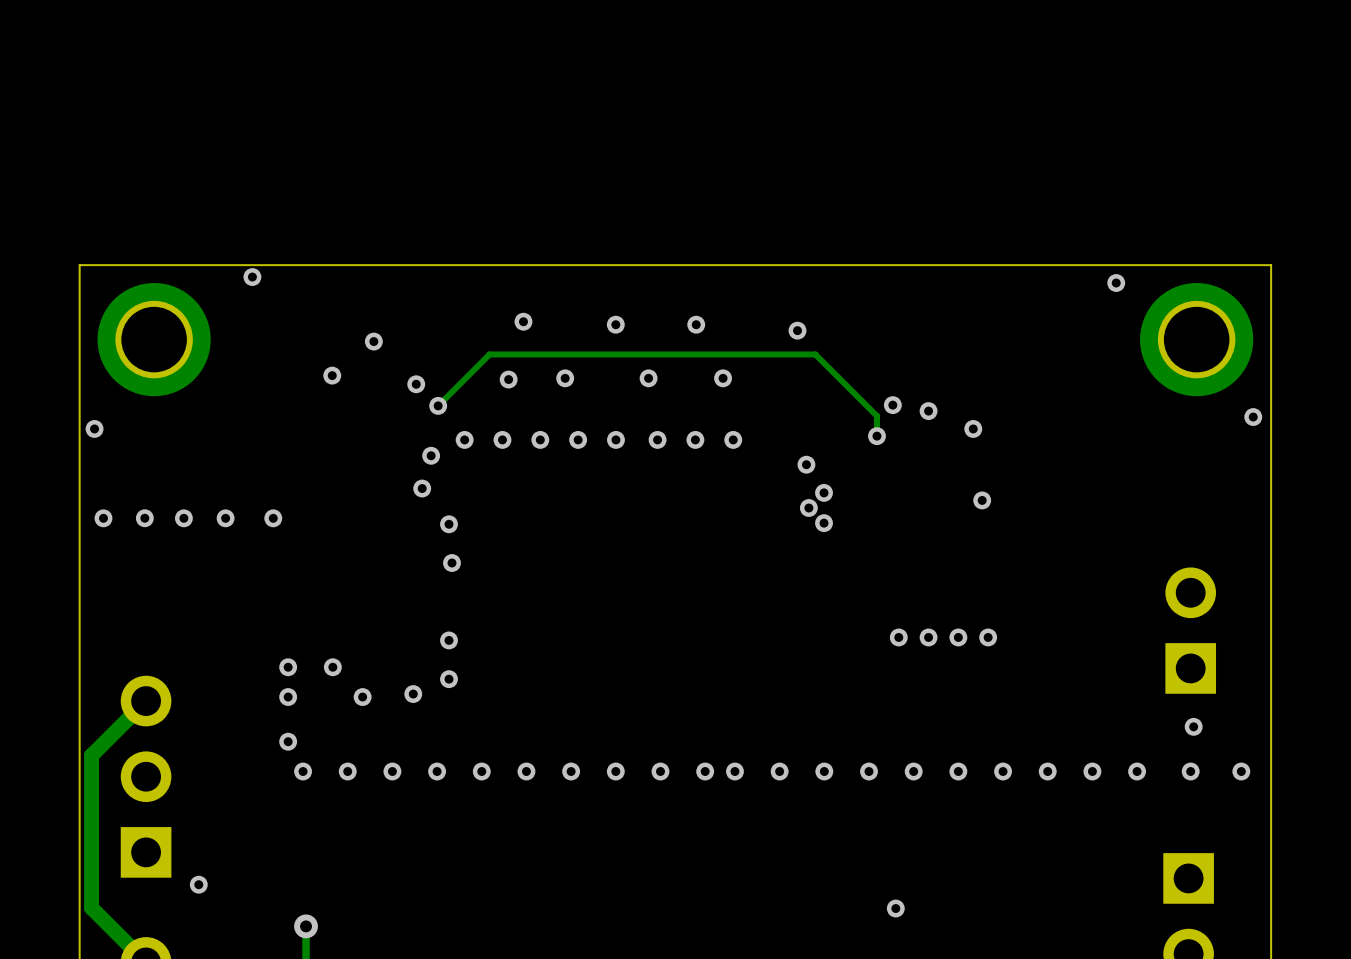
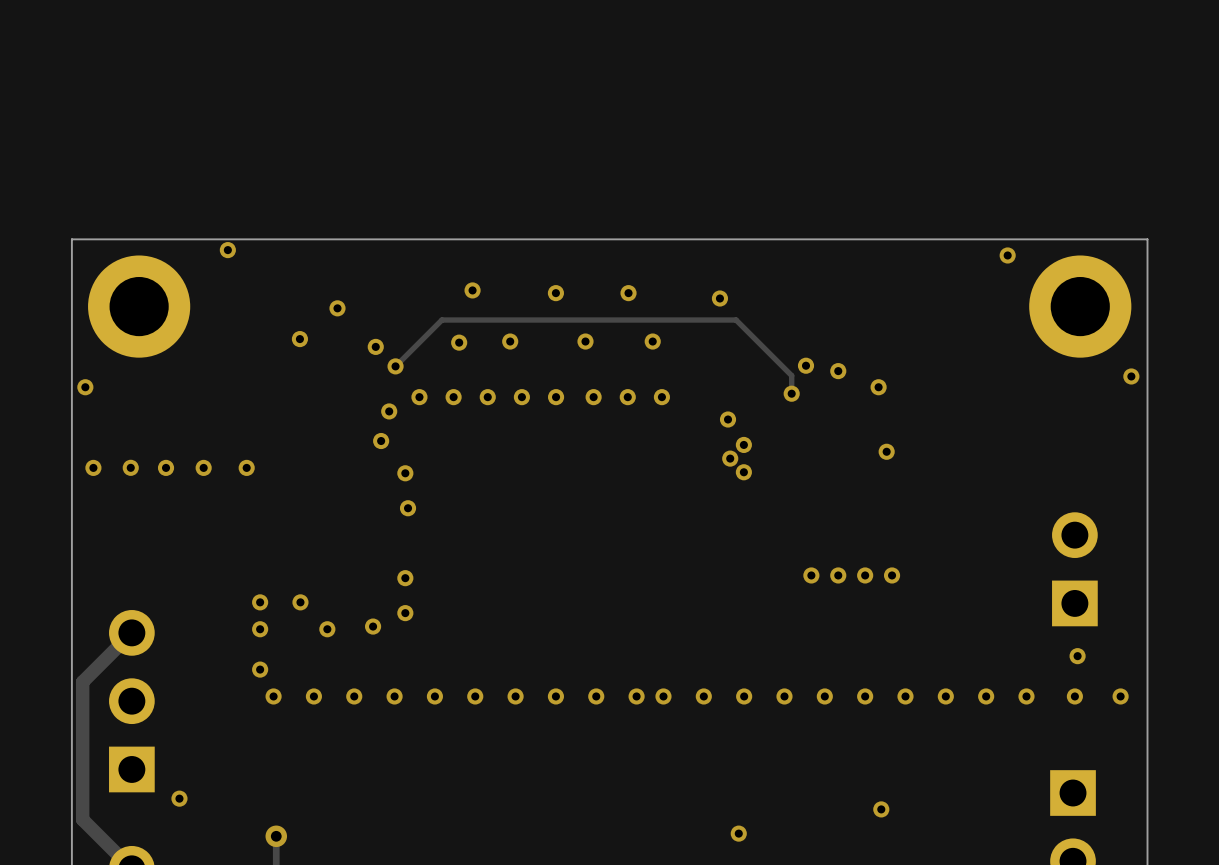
via: none -> (881, 809)
via: (895, 908) -> none
via: none -> (738, 833)

